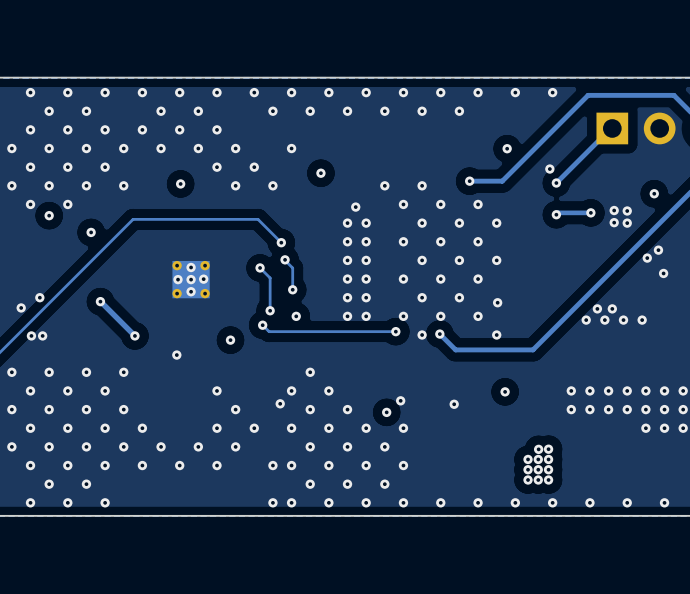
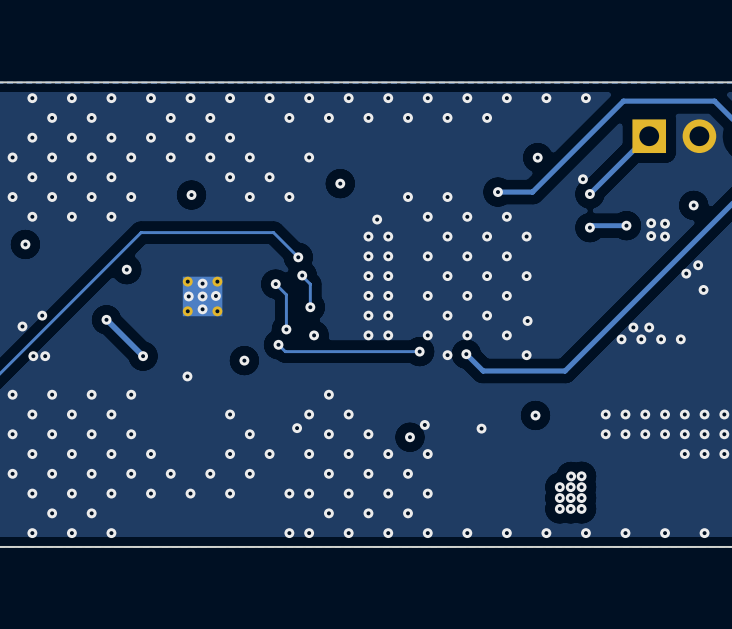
via: none -> (111, 216)
via: (49, 215) -> none
via: none -> (25, 244)
via: (91, 232) -> none
via: none -> (126, 269)

